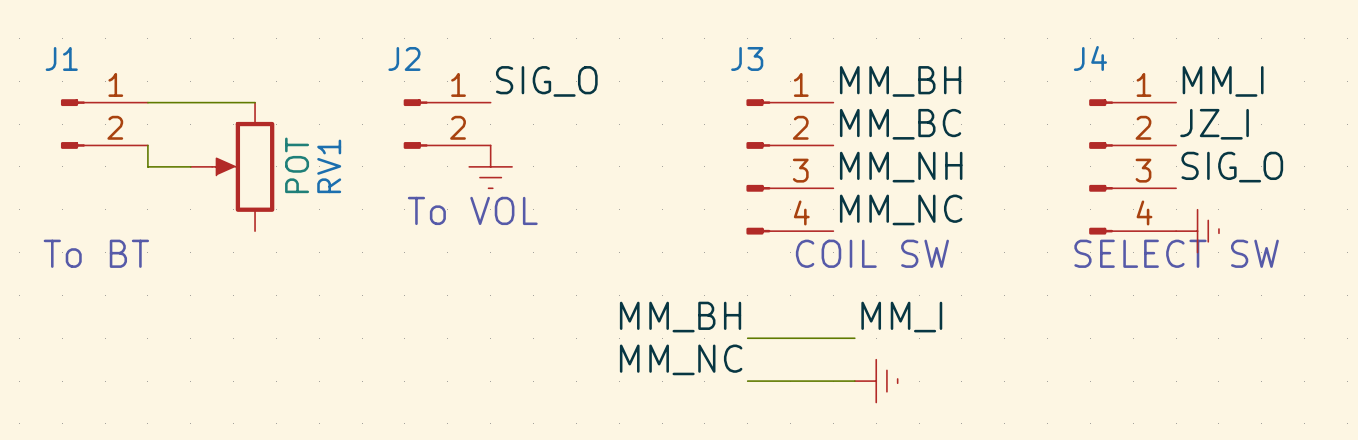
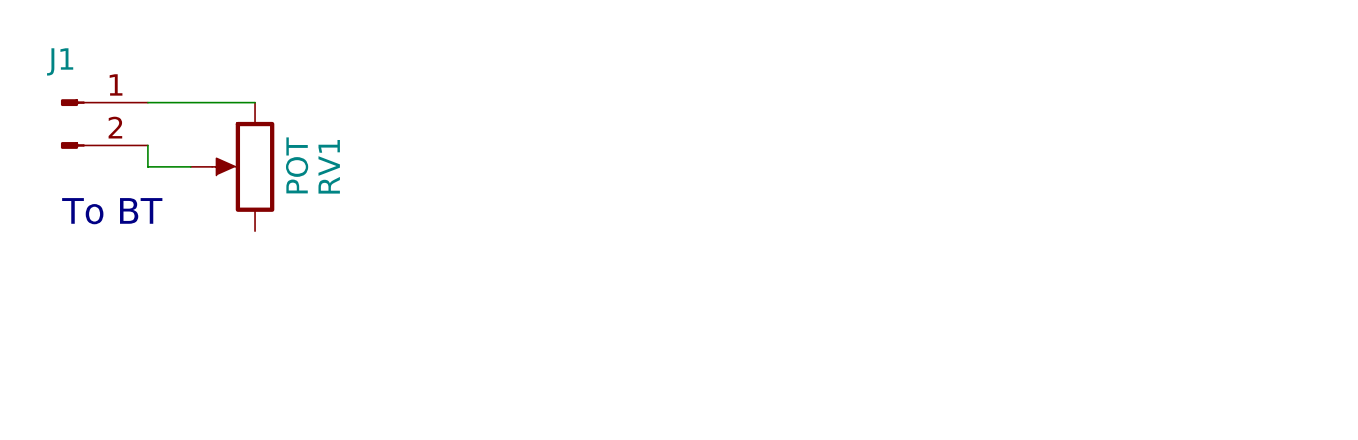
label: SIG_O (546, 81) -> none
label: MM_BH (900, 81) -> none
label: MM_I (1223, 81) -> none
J2: (447, 124) -> none
label: MM_BC (900, 124) -> none
label: JZ_I (1214, 124) -> none
power symbol: (490, 166) -> none
J3: (789, 166) -> none
J4: (1132, 166) -> none
label: MM_NH (901, 167) -> none
label: SIG_O (1232, 167) -> none
label: MM_NC (901, 209) -> none
text: To VOL (472, 210) -> none
power symbol: (1197, 231) -> none
text position: To BT (96, 253) -> To BT (112, 211)
text: COIL SW (872, 253) -> none
text: SELECT SW (1176, 253) -> none
label: MM_BH (680, 317) -> none
label: MM_I (901, 317) -> none
wire: (747, 338) (854, 338) -> none
label: MM_NC (681, 359) -> none
wire: (747, 381) (854, 381) -> none
power symbol: (876, 381) -> none

